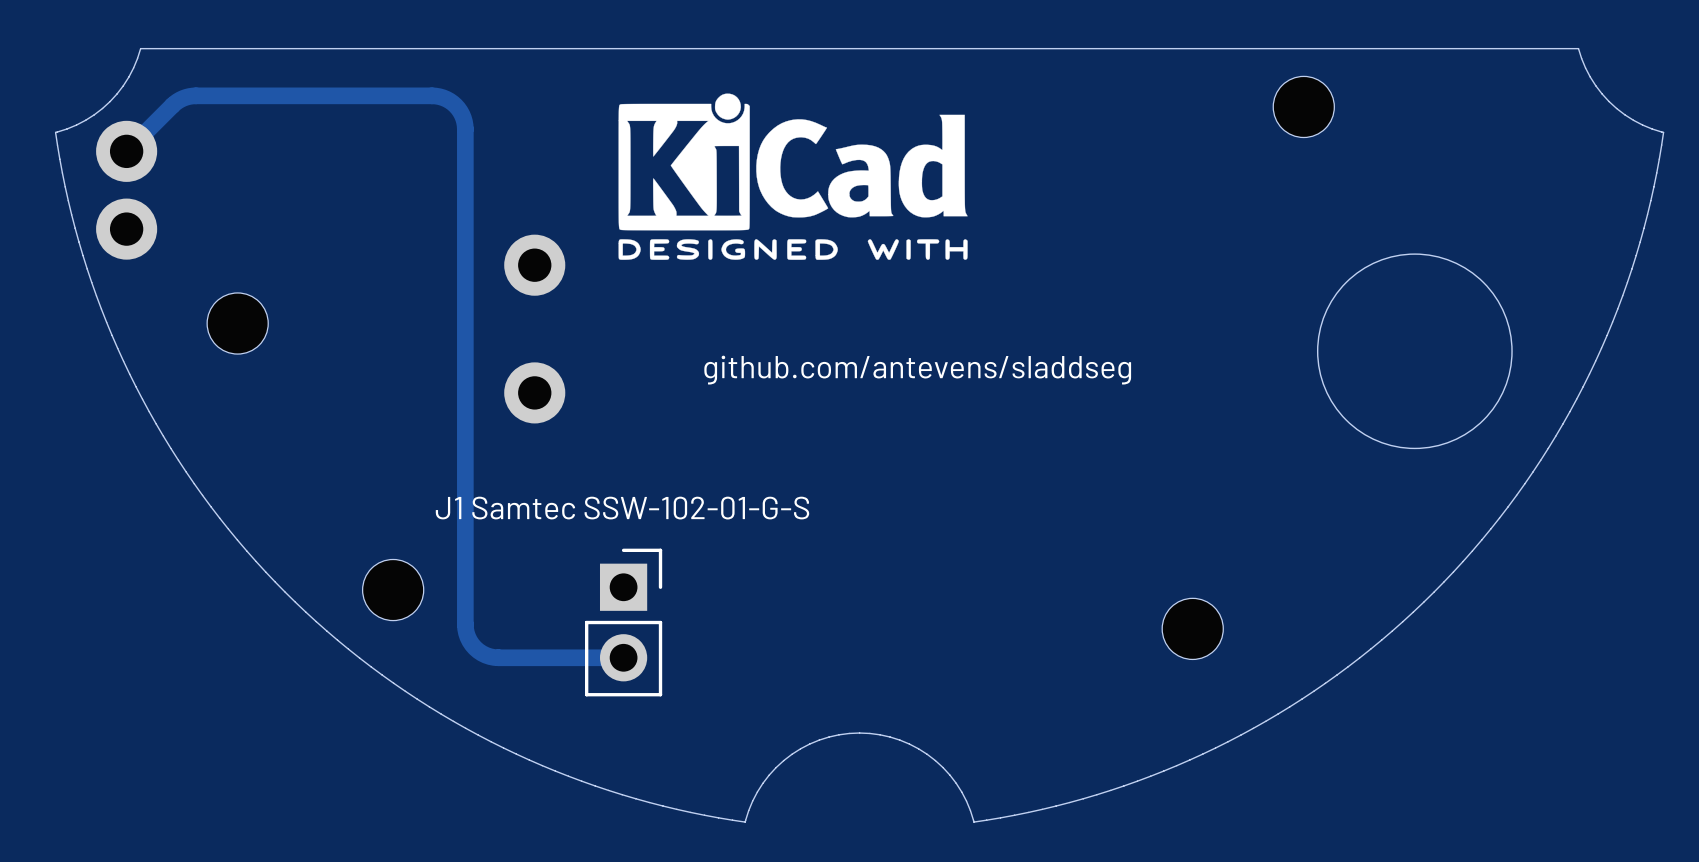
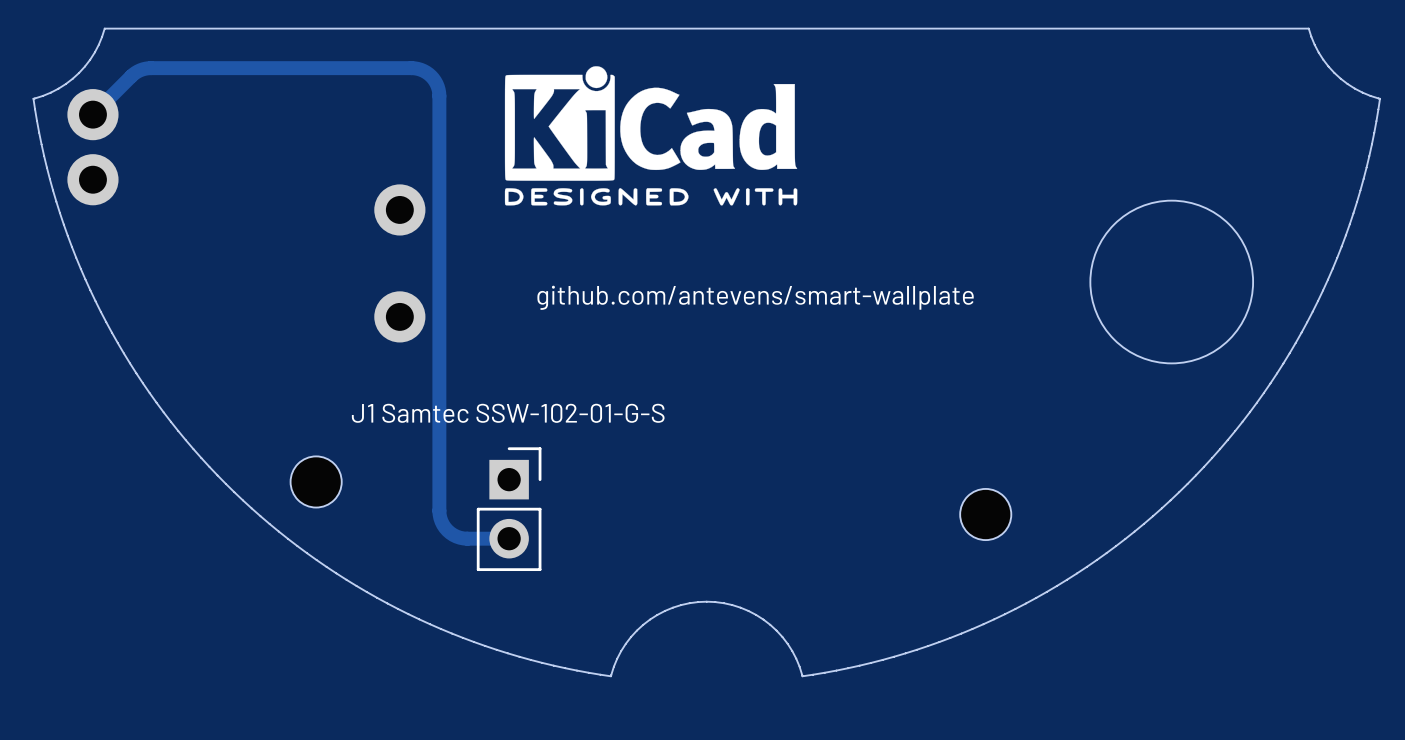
track: (432, 95) (443, 97) (452, 103) (462, 114) (465, 125) (466, 633) (475, 648) (490, 656) (573, 657) -> (348, 68) (417, 68) (431, 76) (438, 89) (439, 510) (441, 521) (447, 530) (456, 536) (467, 538)
part: (1303, 106) -> none
part position: (534, 265) -> (399, 209)
part: (237, 323) -> none
text: github.com/antevens/sladdseg (917, 370) -> github.com/antevens/smart-wallplate (755, 297)
part position: (534, 392) -> (399, 316)

